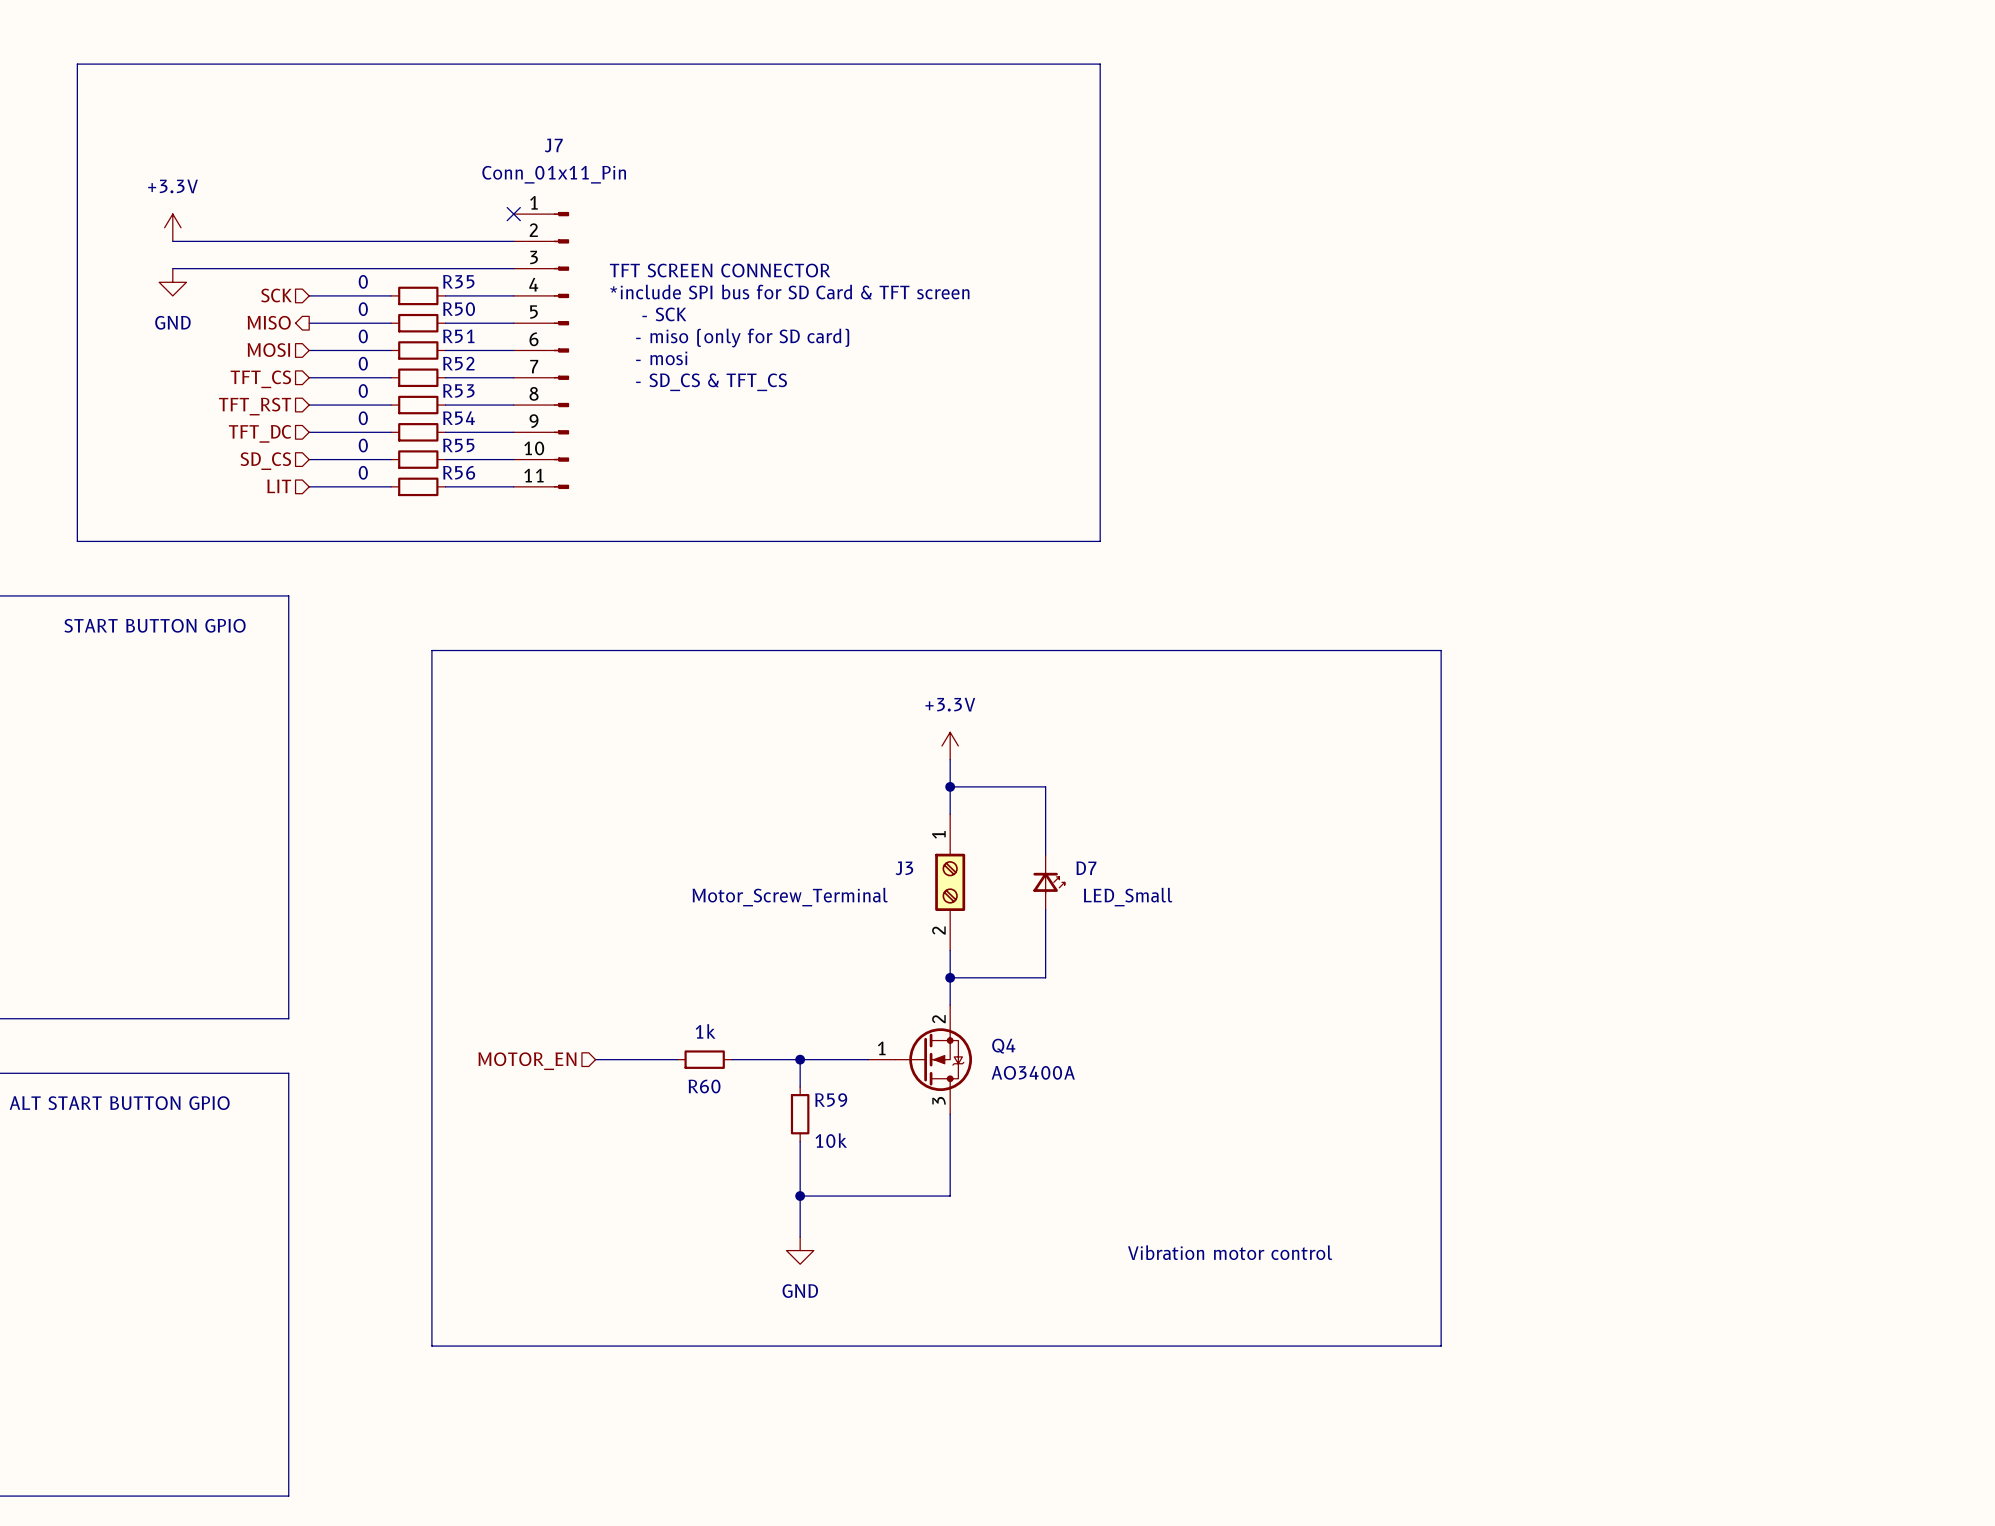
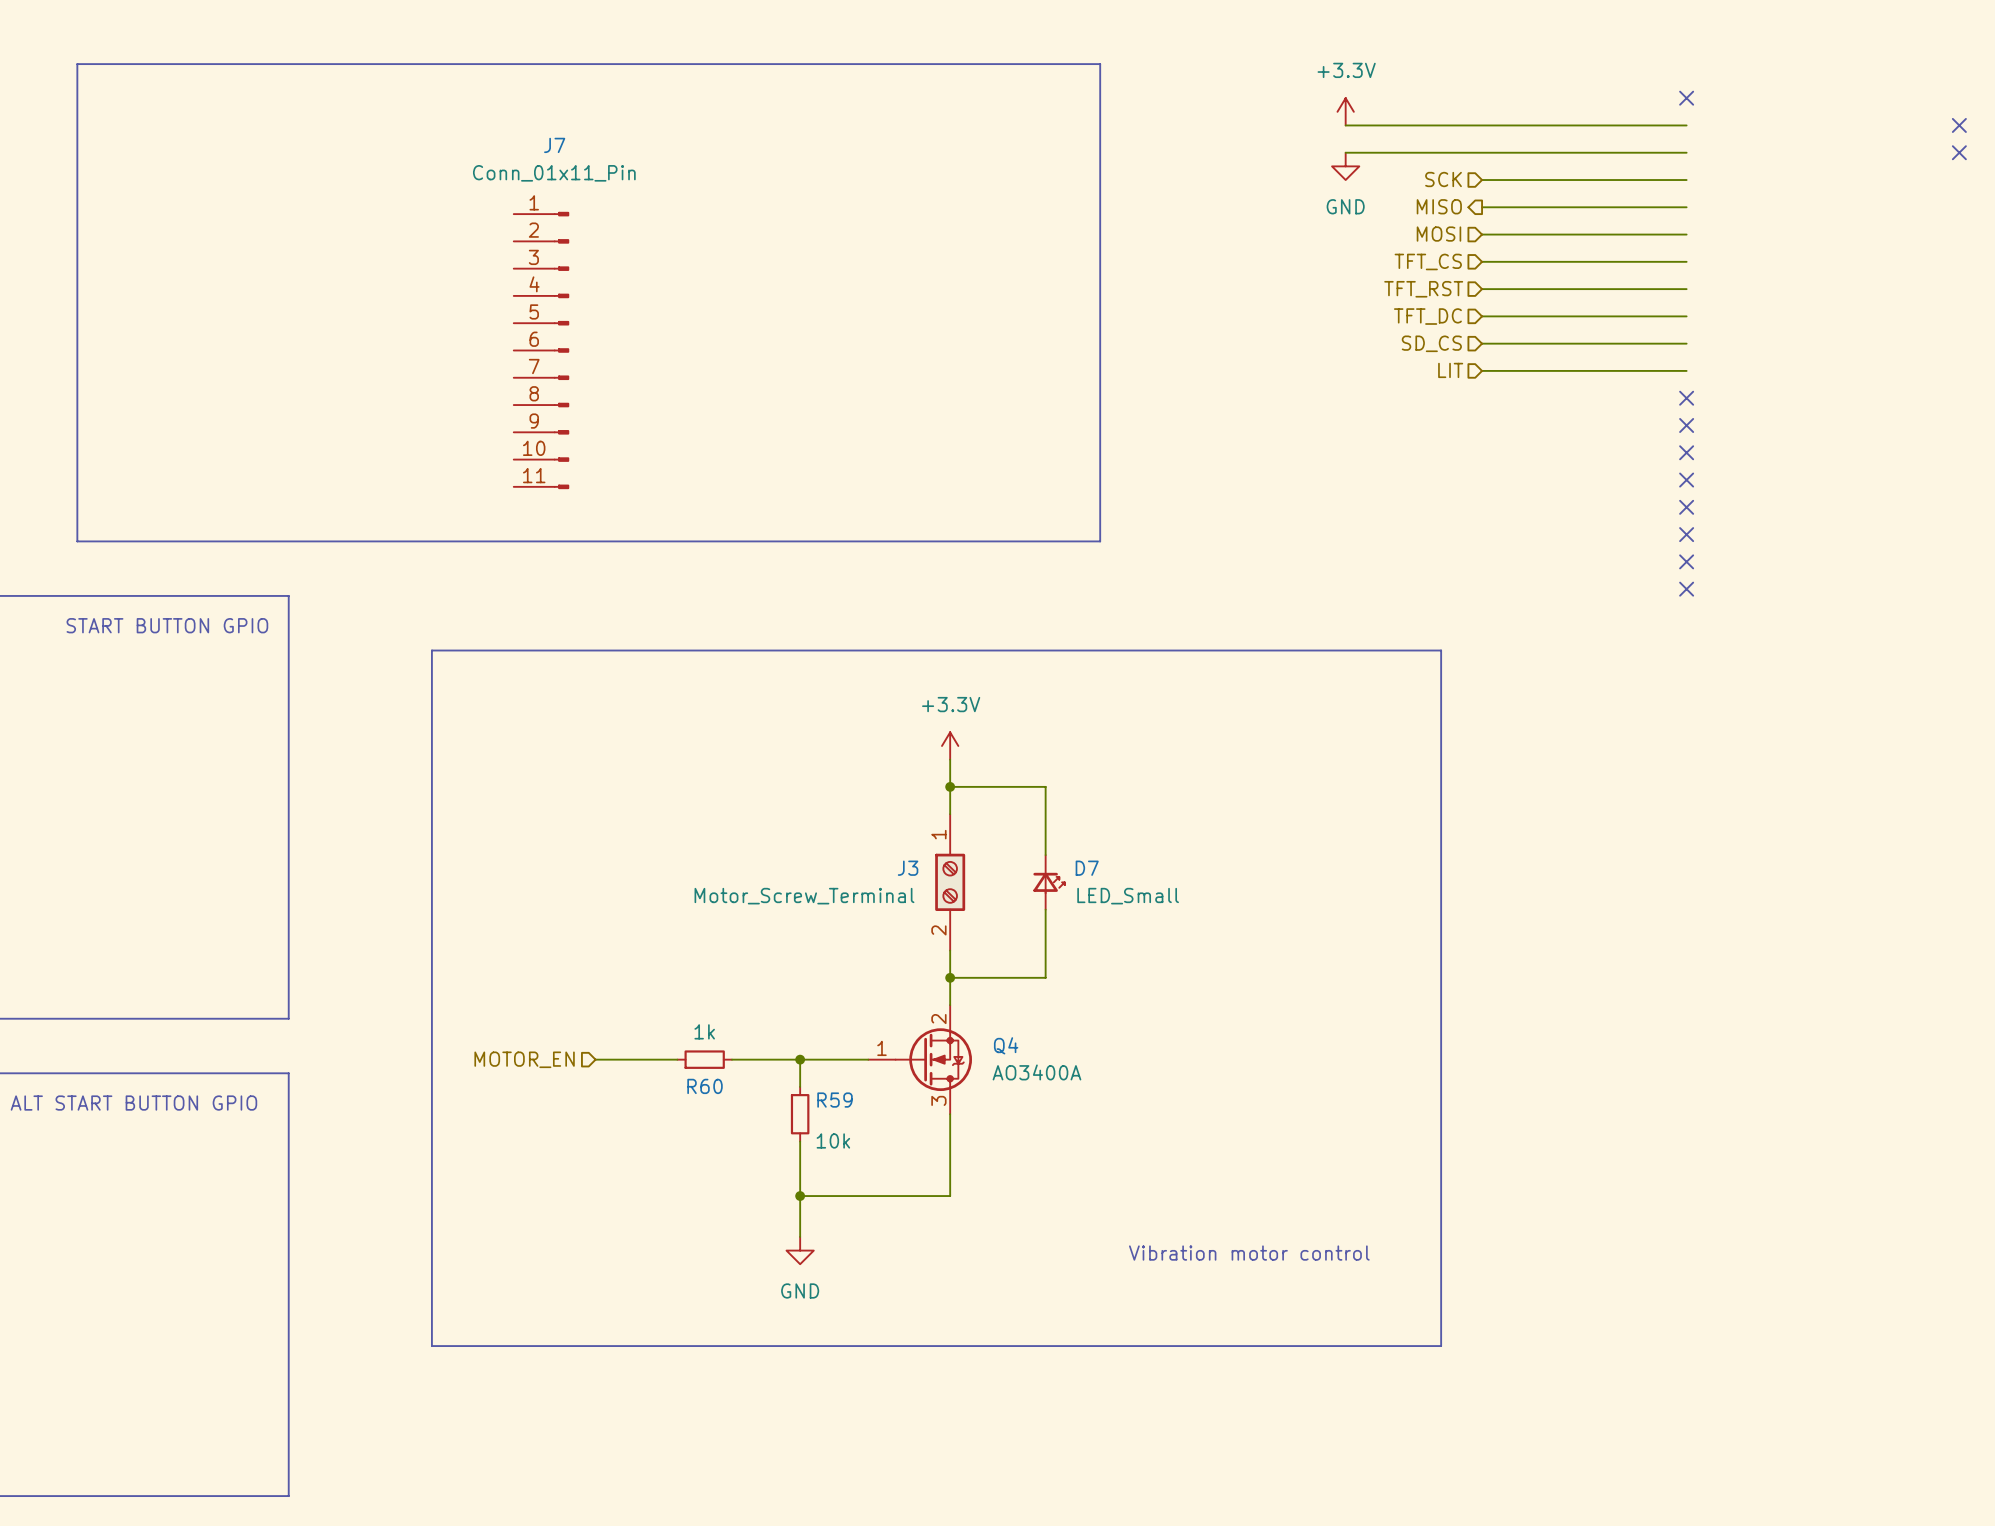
no-connect mark: none -> (1686, 98)
power symbol: none -> +3.3V (1345, 111)
wire: none -> (1345, 125) (1686, 125)
no-connect mark: none -> (1959, 125)
wire: none -> (1345, 152) (1686, 152)
no-connect mark: none -> (1959, 152)
power symbol: none -> GND (1345, 166)
hierarchical label: none -> SCK (1443, 179)
wire: none -> (1482, 180) (1686, 180)
hierarchical label: none -> MISO (1439, 206)
wire: none -> (1482, 207) (1686, 207)
no-connect mark: (513, 214) -> none
power symbol: +3.3V (172, 227) -> none
hierarchical label: none -> MOSI (1438, 234)
wire: none -> (1482, 234) (1686, 234)
wire: (172, 241) (513, 241) -> none
wire: none -> (1482, 261) (1686, 261)
hierarchical label: none -> TFT_CS (1428, 261)
wire: (172, 268) (513, 268) -> none
text: TFT SCREEN CONNECTOR (720, 270) -> none
power symbol: GND (172, 282) -> none
wire: none -> (1482, 289) (1686, 289)
hierarchical label: none -> TFT_RST (1423, 289)
text: *include SPI bus for SD Card & TFT screen (789, 292) -> none
hierarchical label: SCK (276, 295) -> none
wire: (309, 295) (391, 295) -> none
R35: 0 (418, 295) -> none
wire: (445, 295) (513, 295) -> none
text: - SCK (664, 314) -> none
wire: none -> (1482, 316) (1686, 316)
hierarchical label: none -> TFT_DC (1427, 316)
hierarchical label: MISO (269, 322) -> none
wire: (309, 323) (391, 323) -> none
R50: 0 (418, 323) -> none
wire: (445, 323) (513, 323) -> none
text: - miso (only for SD card) (742, 338) -> none
wire: none -> (1482, 343) (1686, 343)
hierarchical label: none -> SD_CS (1431, 343)
hierarchical label: MOSI (268, 350) -> none
wire: (309, 350) (391, 350) -> none
R51: 0 (418, 350) -> none
wire: (445, 350) (513, 350) -> none
text: - mosi (661, 358) -> none
hierarchical label: none -> LIT (1450, 370)
wire: none -> (1482, 370) (1686, 370)
wire: (309, 377) (391, 377) -> none
R52: 0 (418, 377) -> none
wire: (445, 377) (513, 377) -> none
hierarchical label: TFT_CS (260, 379) -> none
text: - SD_CS & TFT_CS (711, 382) -> none
no-connect mark: none -> (1686, 398)
wire: (309, 405) (391, 405) -> none
R53: 0 (418, 405) -> none
wire: (445, 405) (513, 405) -> none
hierarchical label: TFT_RST (255, 406) -> none
no-connect mark: none -> (1686, 425)
wire: (309, 432) (391, 432) -> none
R54: 0 (418, 432) -> none
wire: (445, 432) (513, 432) -> none
hierarchical label: TFT_DC (260, 433) -> none
no-connect mark: none -> (1686, 452)
wire: (309, 459) (391, 459) -> none
R55: 0 (418, 459) -> none
wire: (445, 459) (513, 459) -> none
hierarchical label: SD_CS (265, 461) -> none
no-connect mark: none -> (1686, 480)
hierarchical label: LIT (279, 486) -> none
wire: (309, 486) (391, 486) -> none
R56: 0 (418, 486) -> none
wire: (445, 486) (513, 486) -> none
no-connect mark: none -> (1686, 507)
no-connect mark: none -> (1686, 534)
no-connect mark: none -> (1686, 561)
no-connect mark: none -> (1686, 589)

